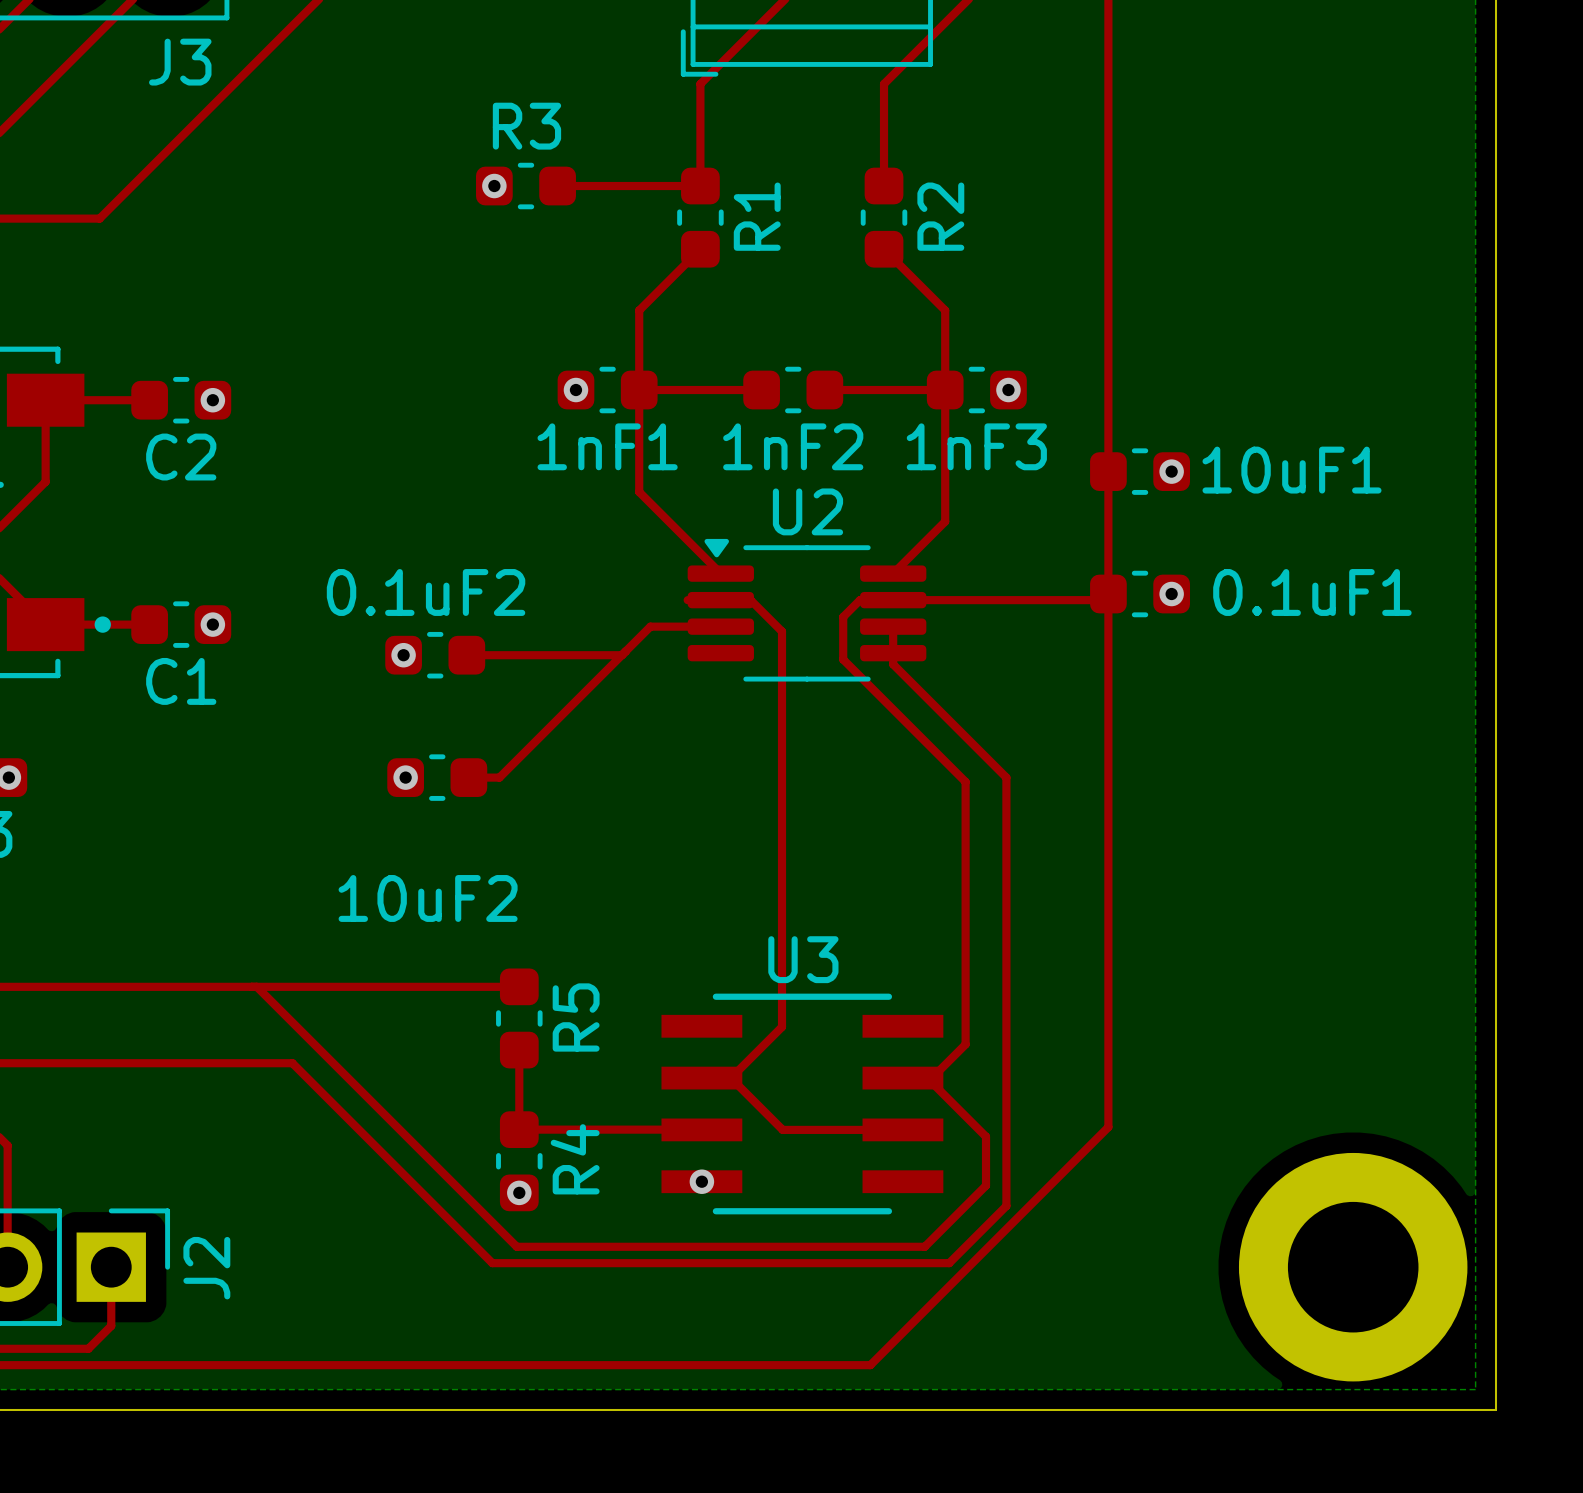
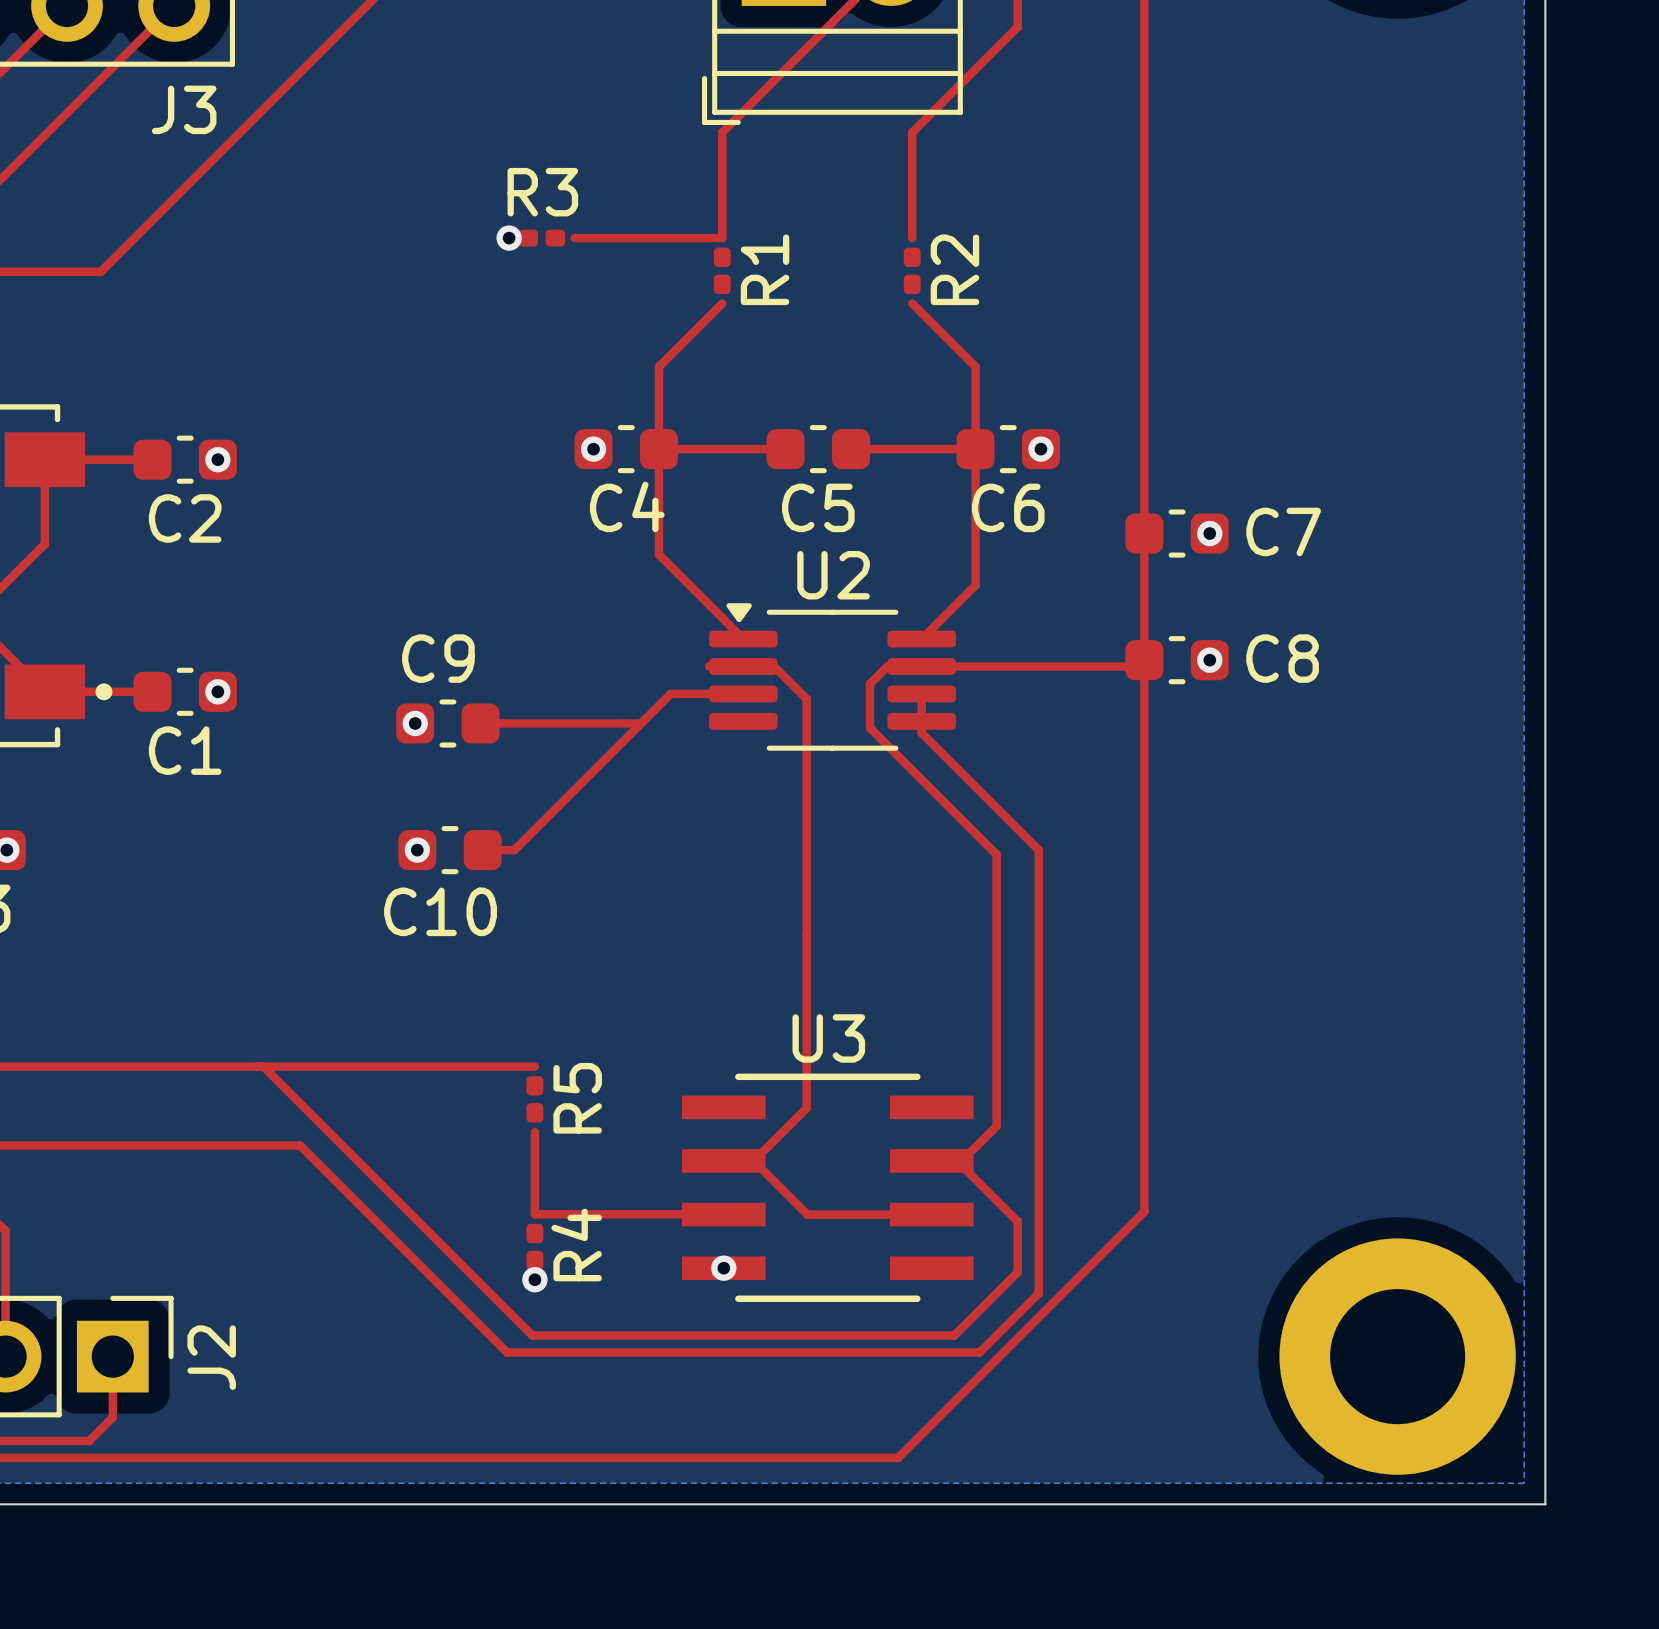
R3 footprint: [476, 162, 576, 210] -> [518, 229, 566, 247]
R1 footprint: [677, 167, 724, 268] -> [713, 247, 731, 295]
R2 footprint: [860, 167, 908, 268] -> [903, 247, 921, 295]
1nF1 name: 1nF1 (607, 446) -> C4 (627, 506)
1nF2 name: 1nF2 (793, 446) -> C5 (818, 507)
1nF3 name: 1nF3 (976, 446) -> C6 (1008, 507)
10uF1 name: 10uF1 (1292, 470) -> C7 (1283, 531)
0.1uF2 name: 0.1uF2 (426, 592) -> C9 (438, 658)
0.1uF1 name: 0.1uF1 (1312, 592) -> C8 (1282, 658)
10uF2 name: 10uF2 (428, 898) -> C10 (440, 911)
R5 footprint: [496, 968, 543, 1069] -> [526, 1076, 544, 1123]
R4 footprint: [496, 1111, 543, 1212] -> [526, 1223, 544, 1271]

